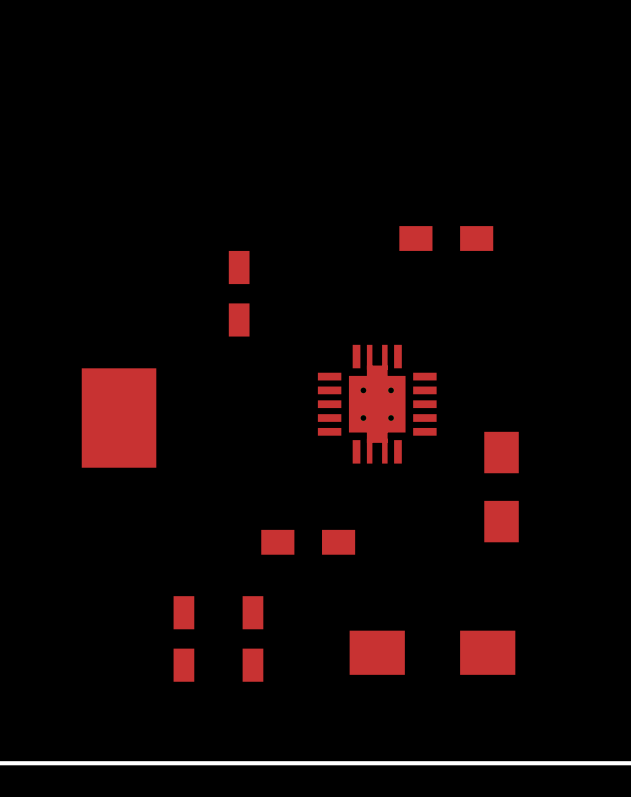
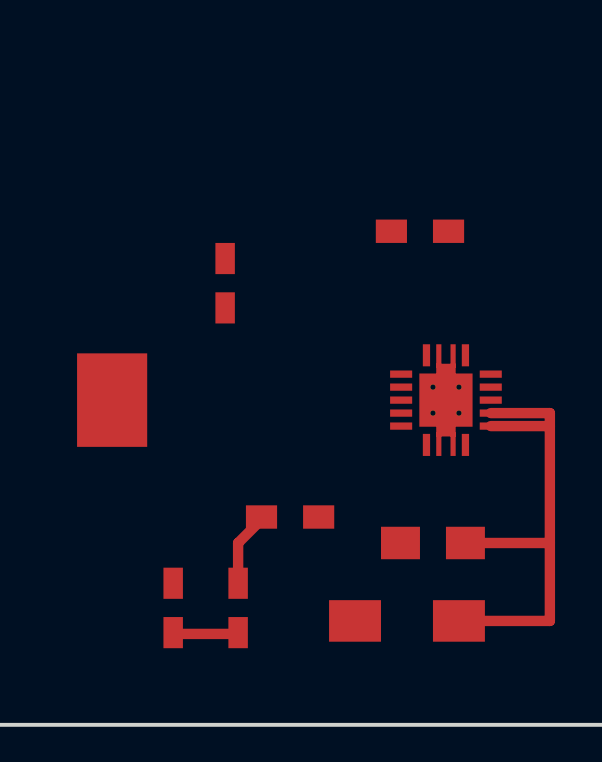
part position: (377, 404) -> (445, 400)
top track: none -> (490, 413) (549, 413) (549, 620) (458, 620)
top track: none -> (549, 426) (490, 426)
part rotation: 0° (501, 487) -> 90° clockwise (432, 542)
part position: (501, 487) -> (432, 542)
top track: none -> (261, 517) (264, 517) (238, 542) (238, 583)
top track: none -> (549, 542) (465, 542)
top track: none -> (238, 632) (173, 632)

